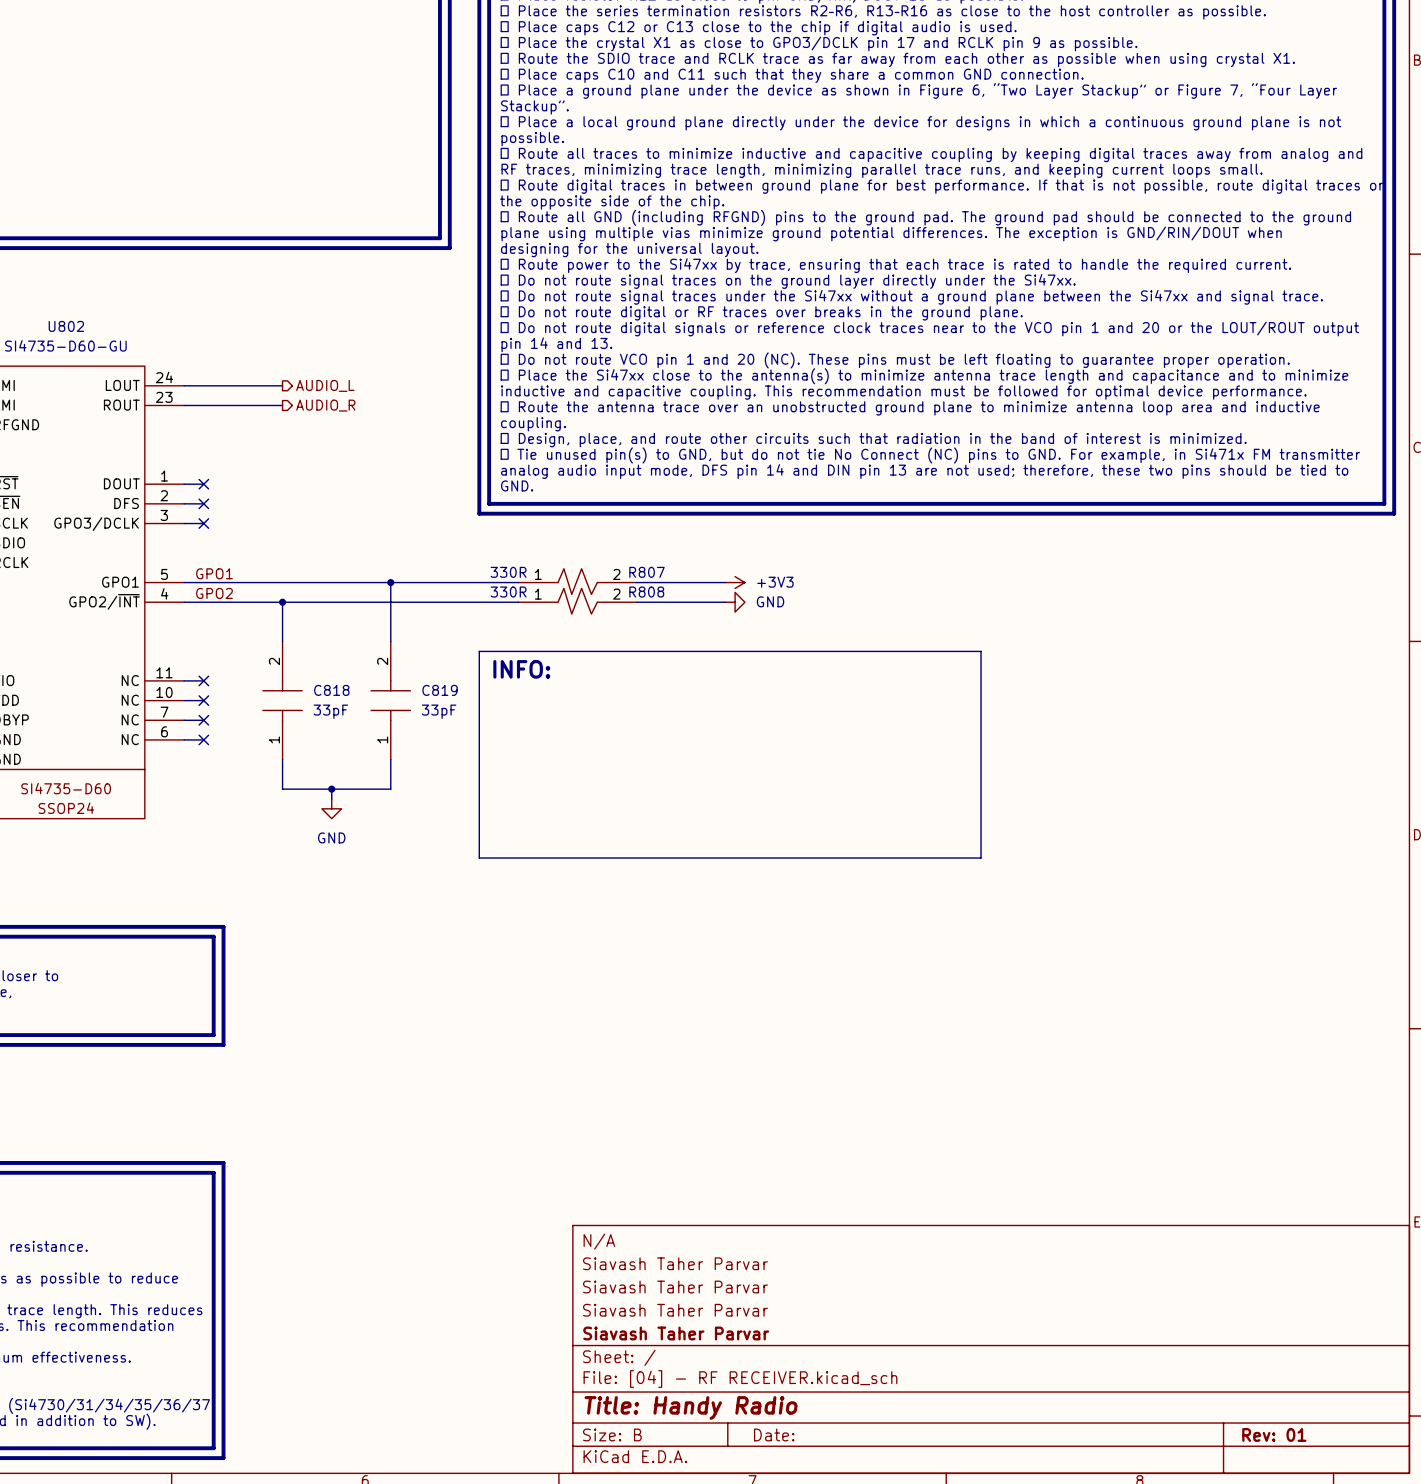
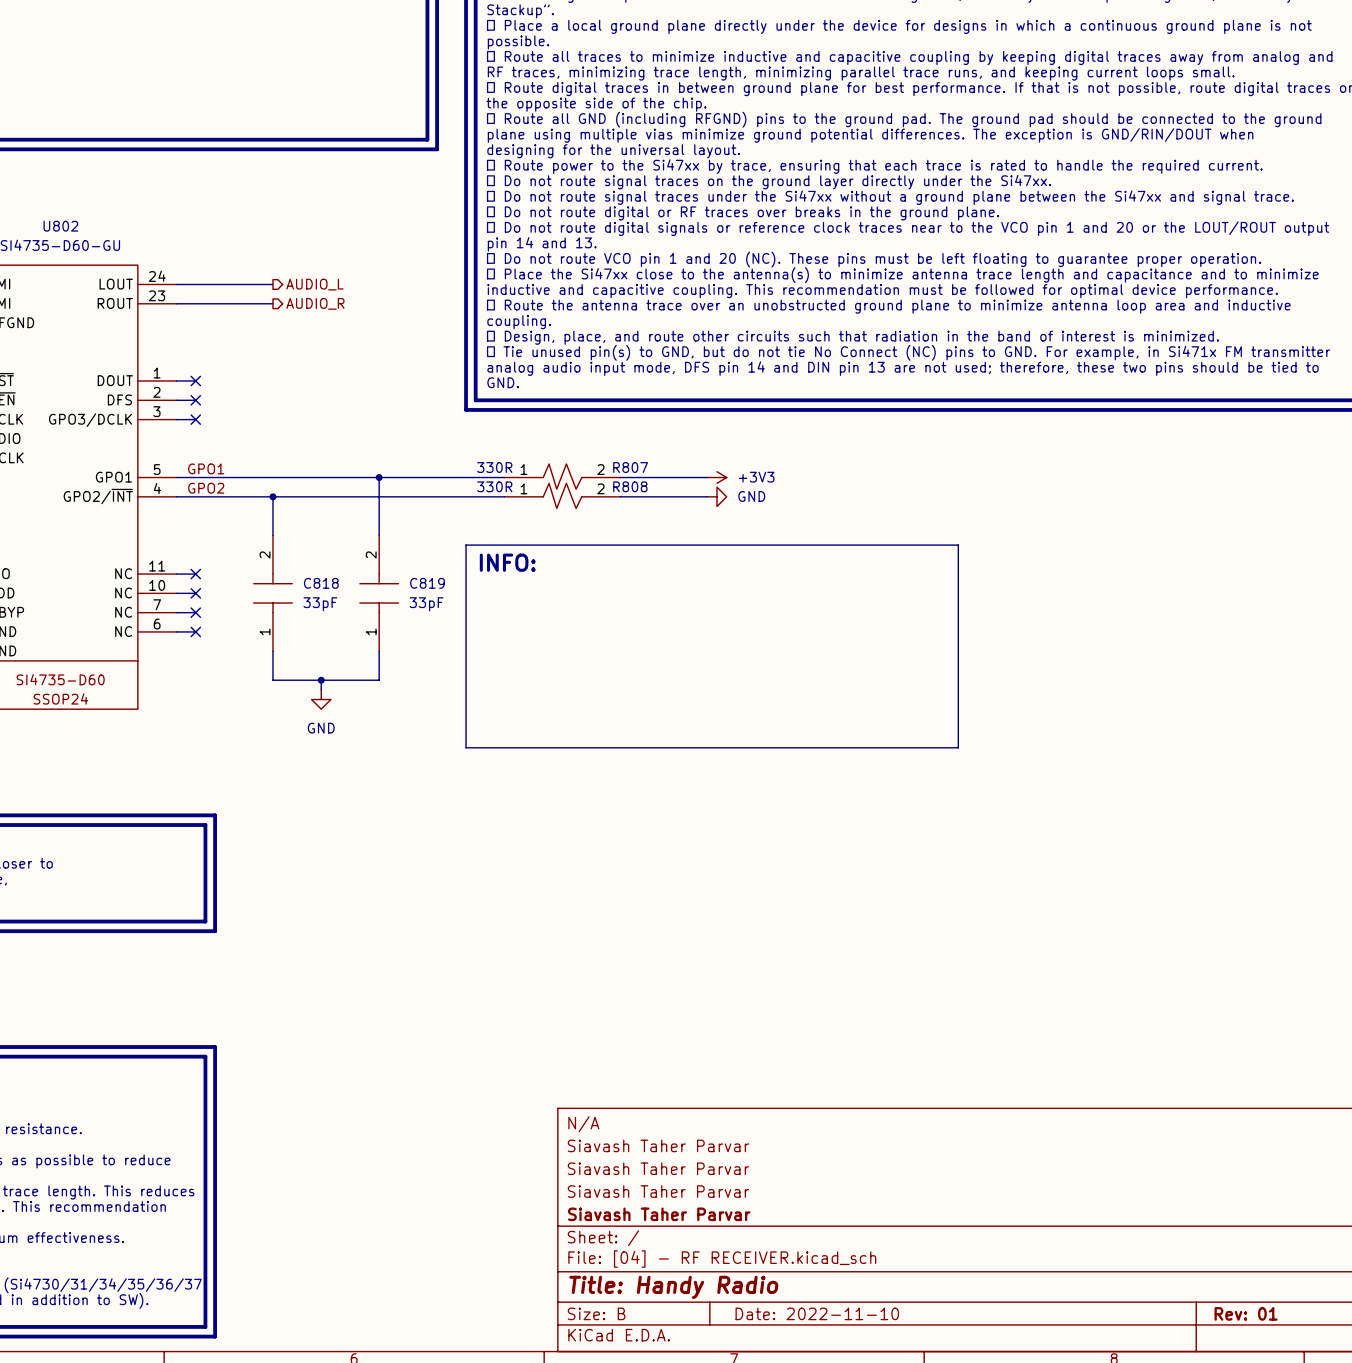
title block: Date: (774, 1434) -> Date: 2022-11-10 (817, 1313)

